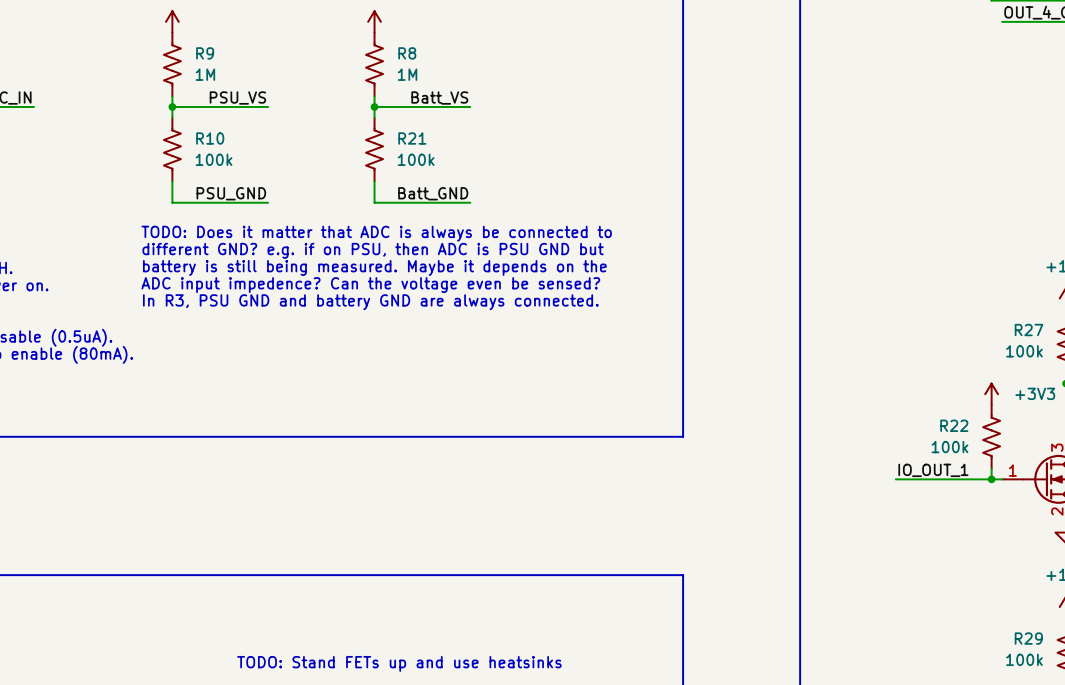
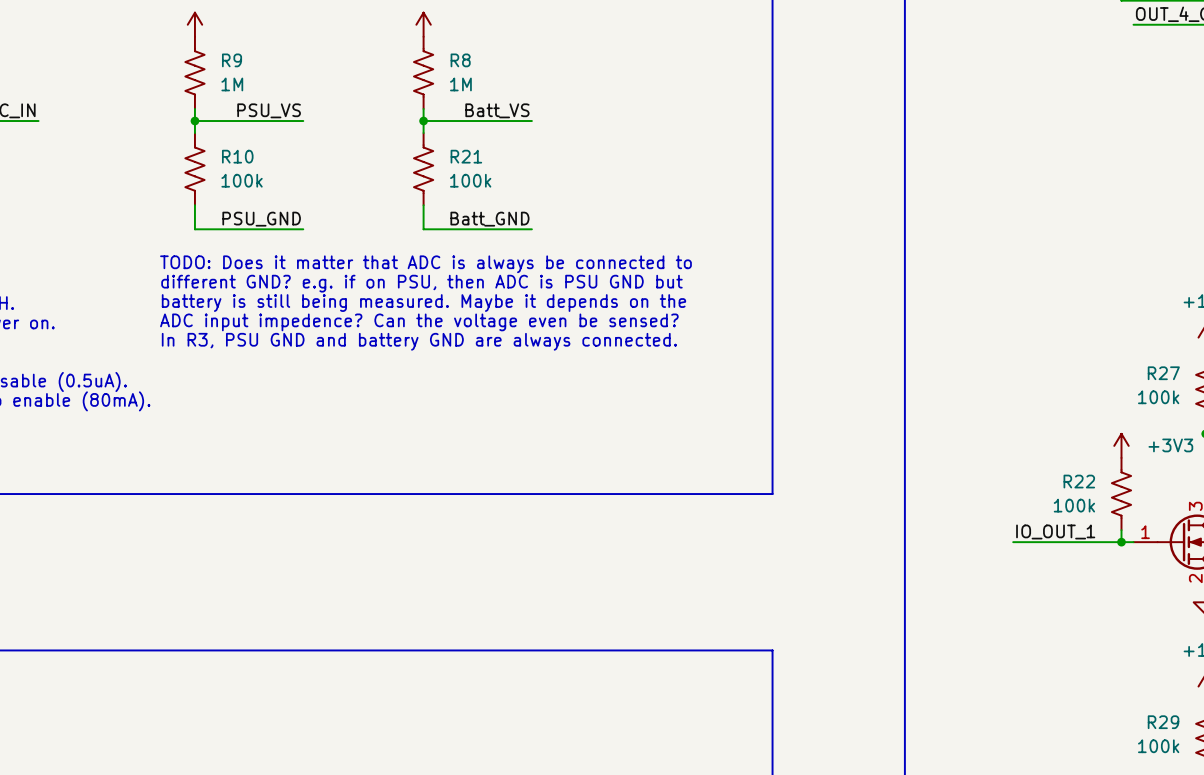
text: TODO: Stand FETs up and use heatsinks (399, 663) -> none

